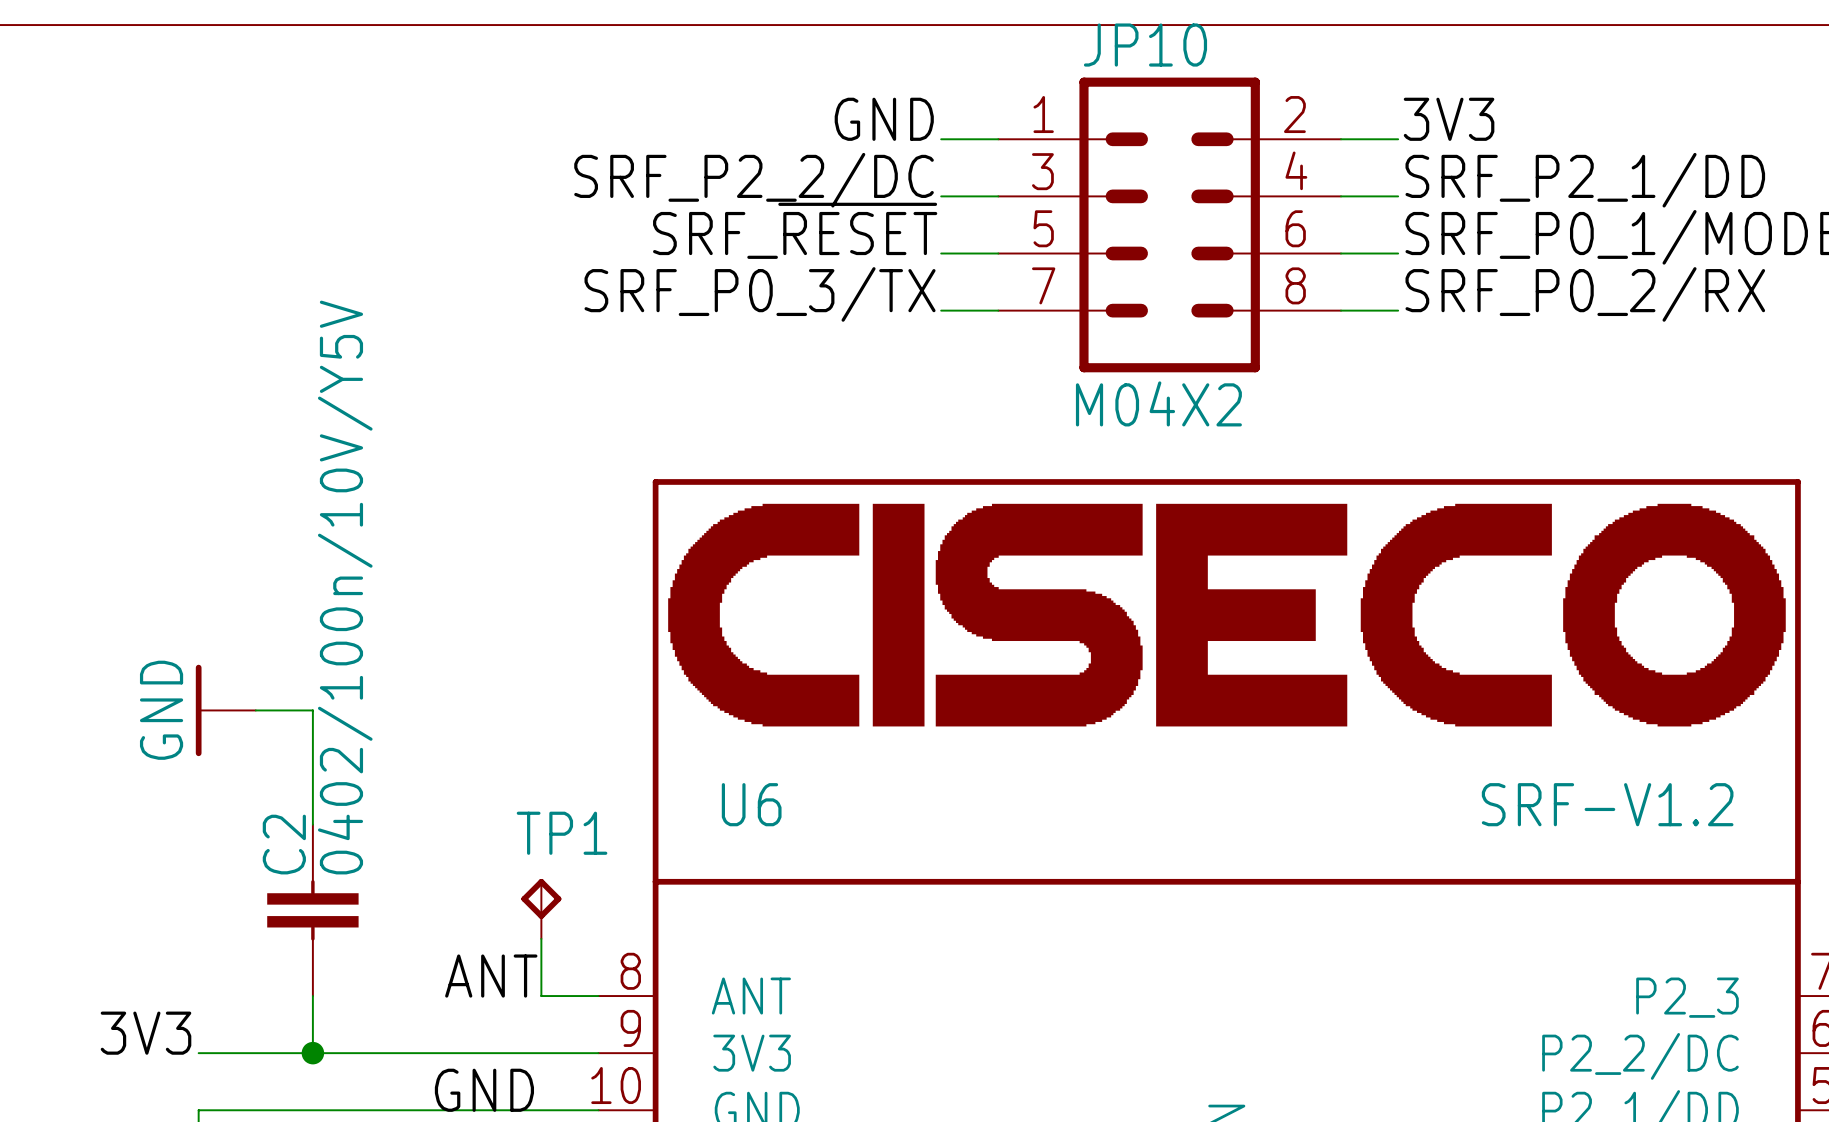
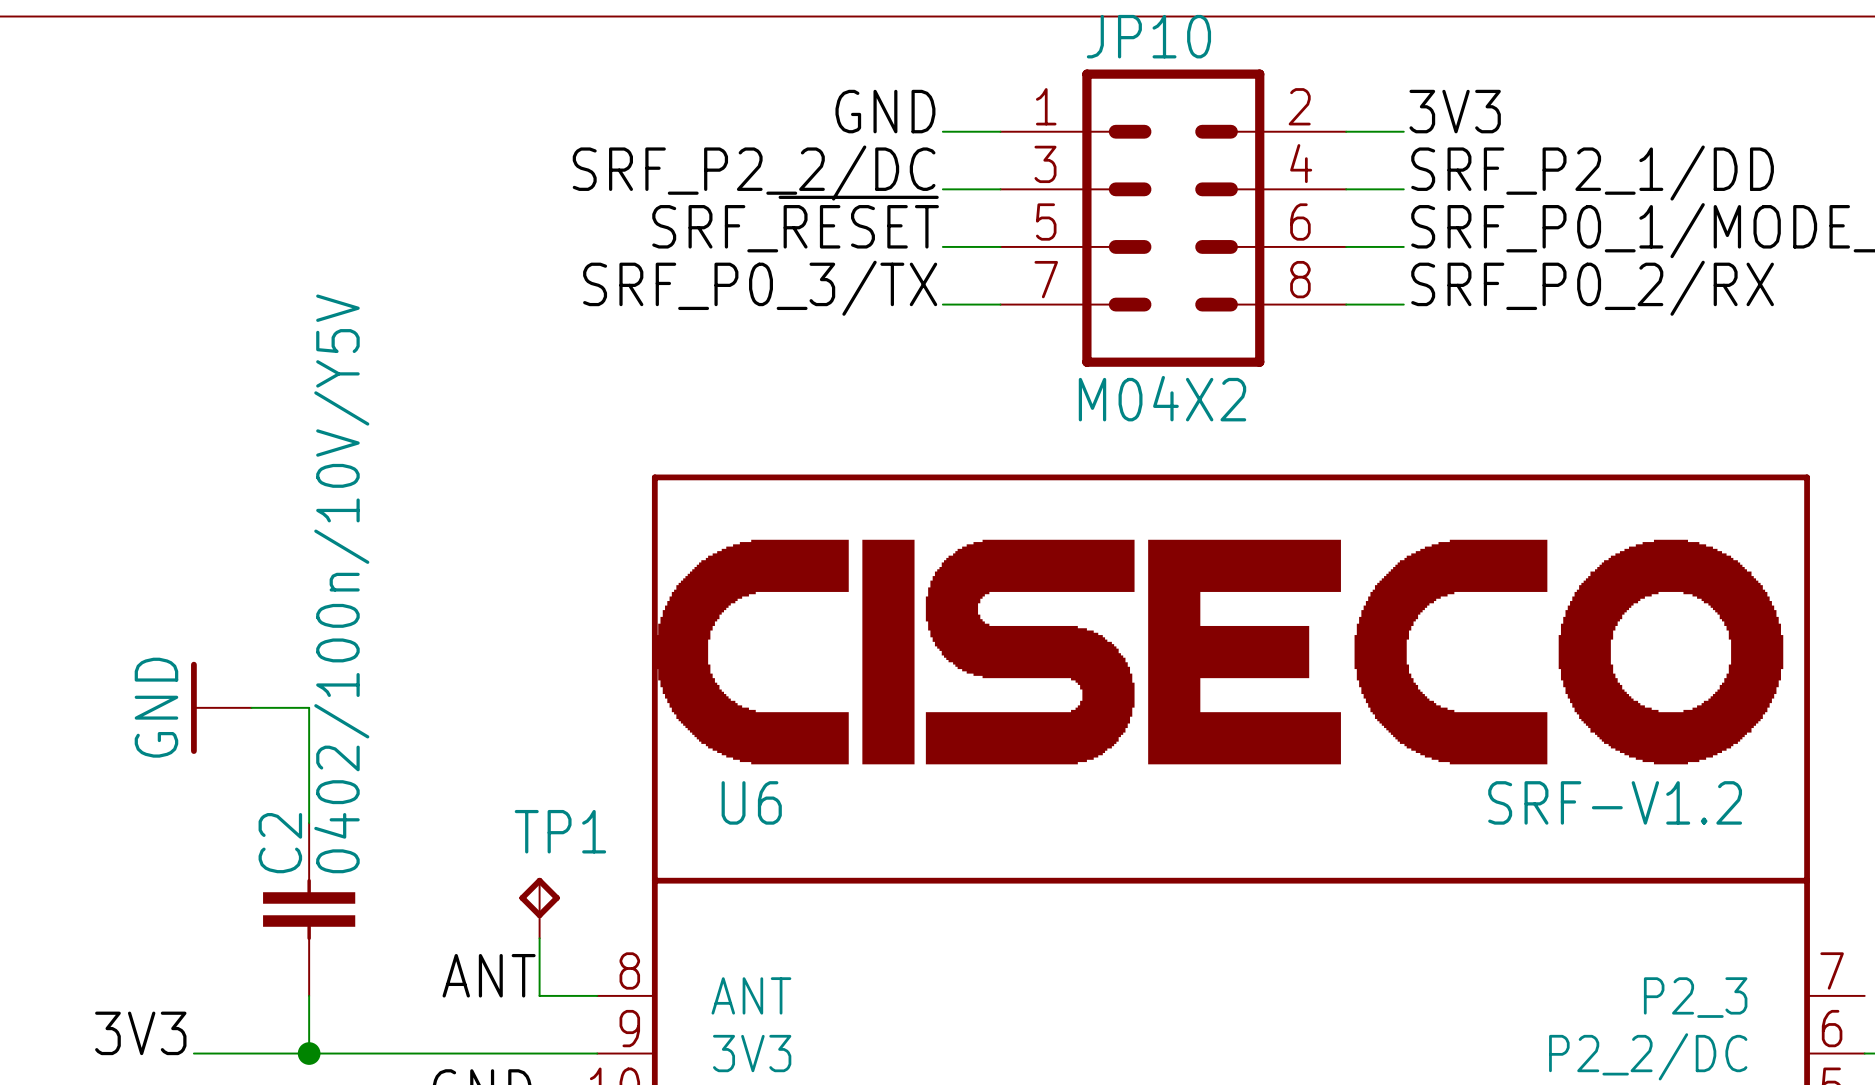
part position: (1226, 615) -> (1219, 652)

